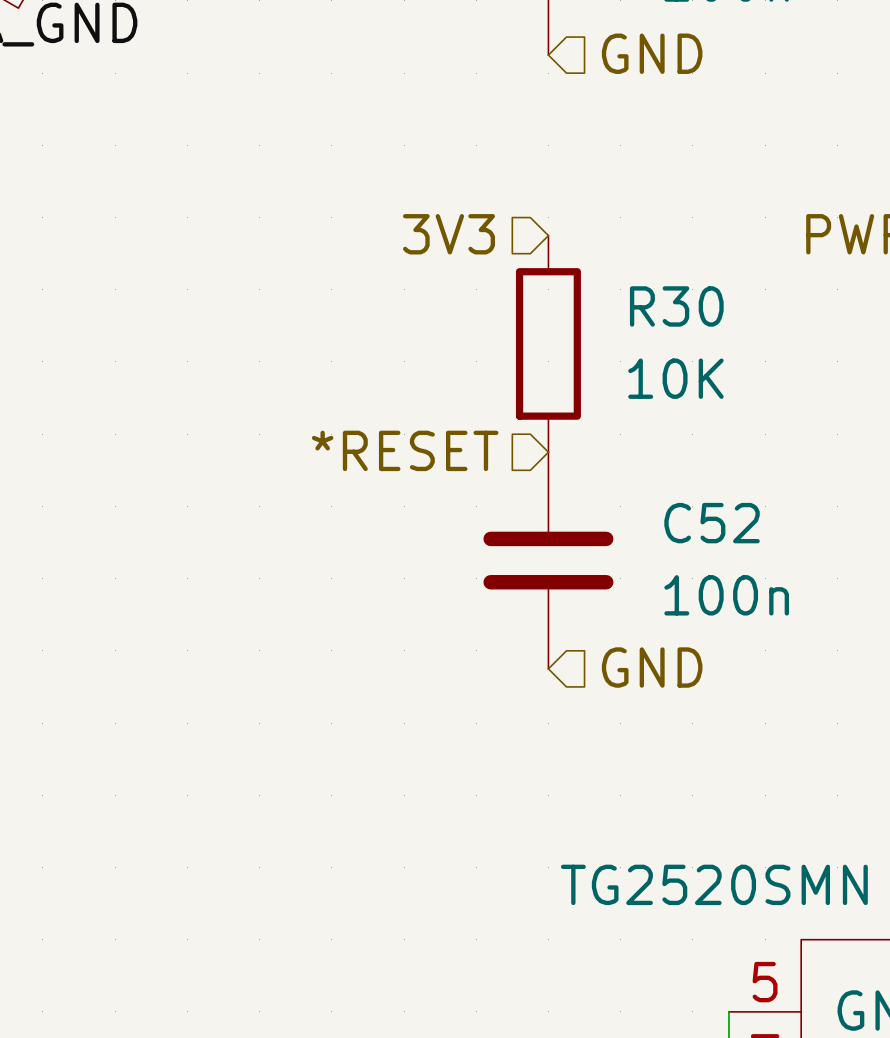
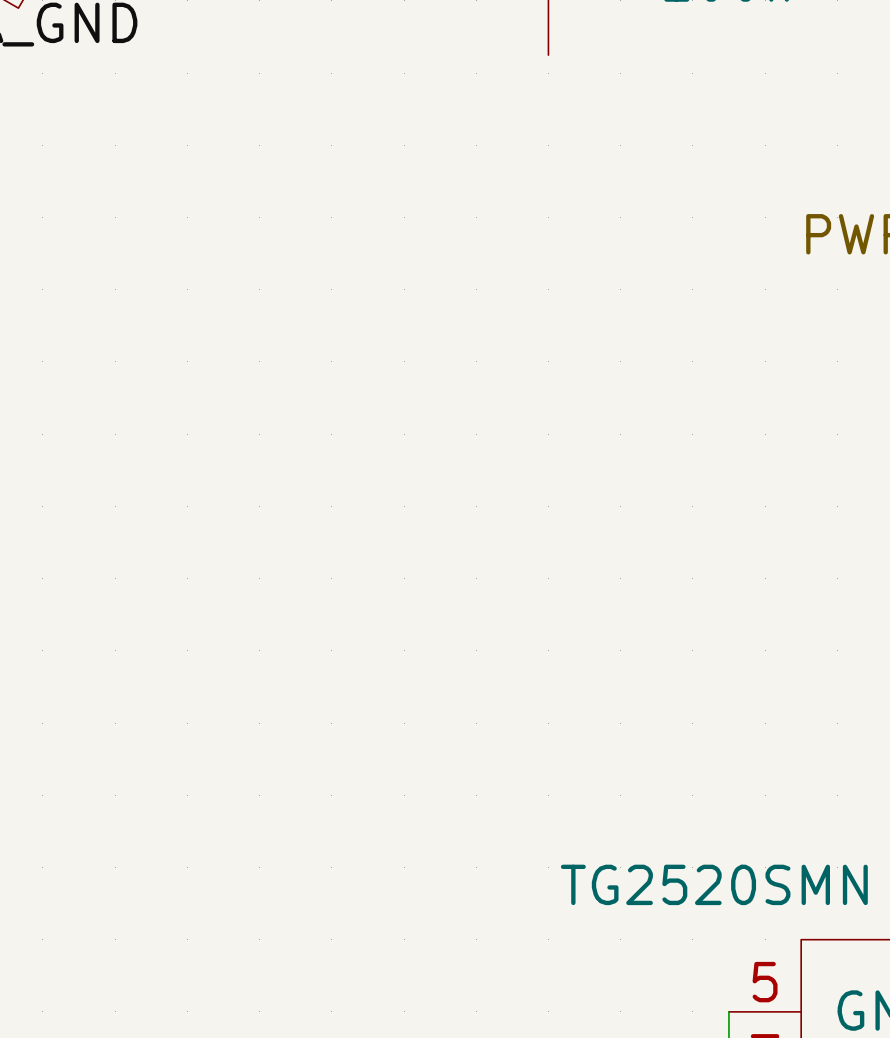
hierarchical label: GND (652, 53) -> none
hierarchical label: 3V3 (449, 234) -> none
R30: 10K (548, 343) -> none
hierarchical label: *RESET (405, 450) -> none
C52: 100n (548, 560) -> none
hierarchical label: GND (652, 667) -> none

